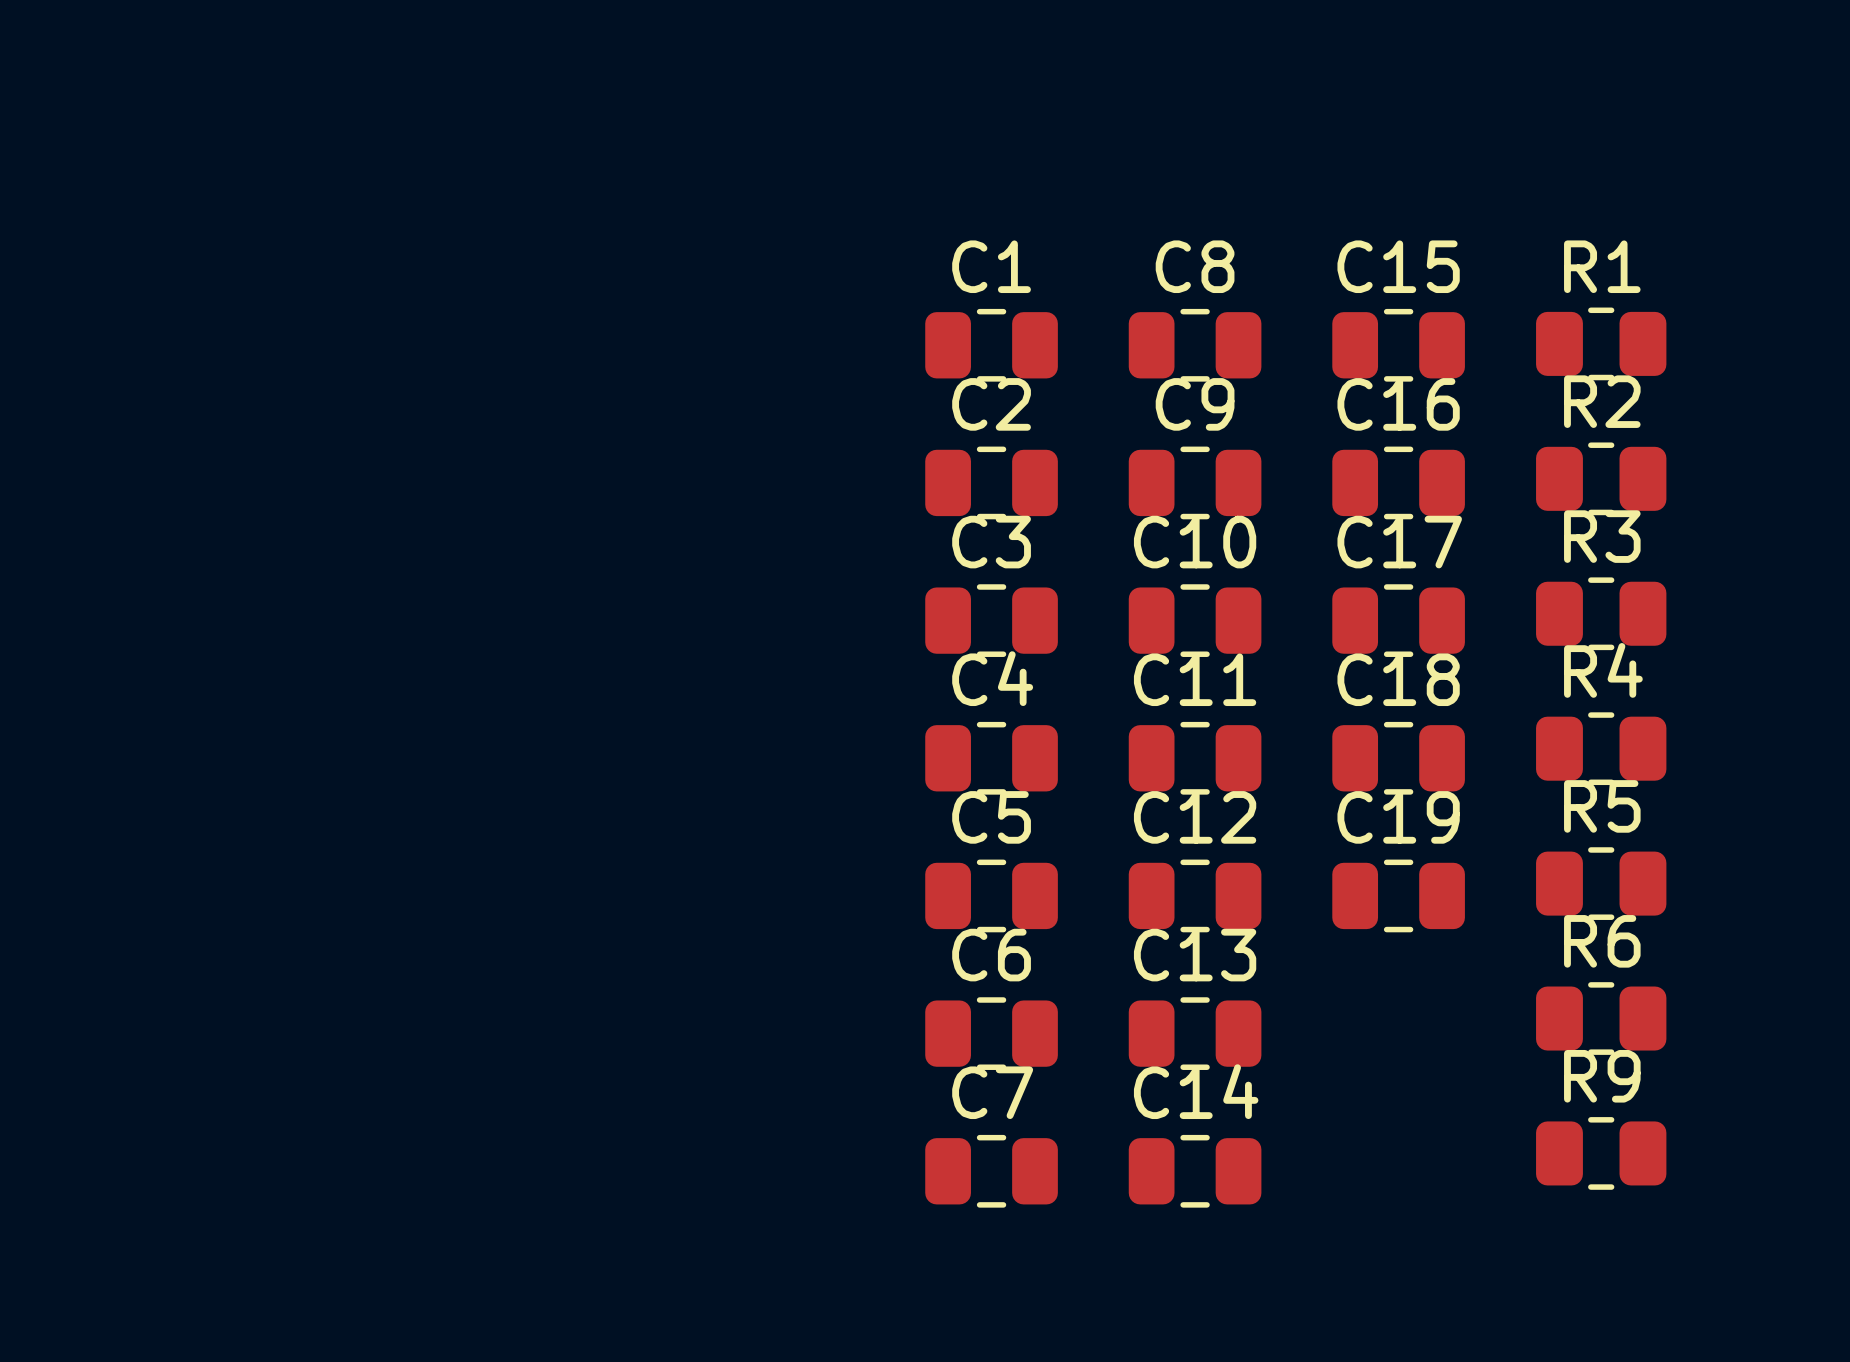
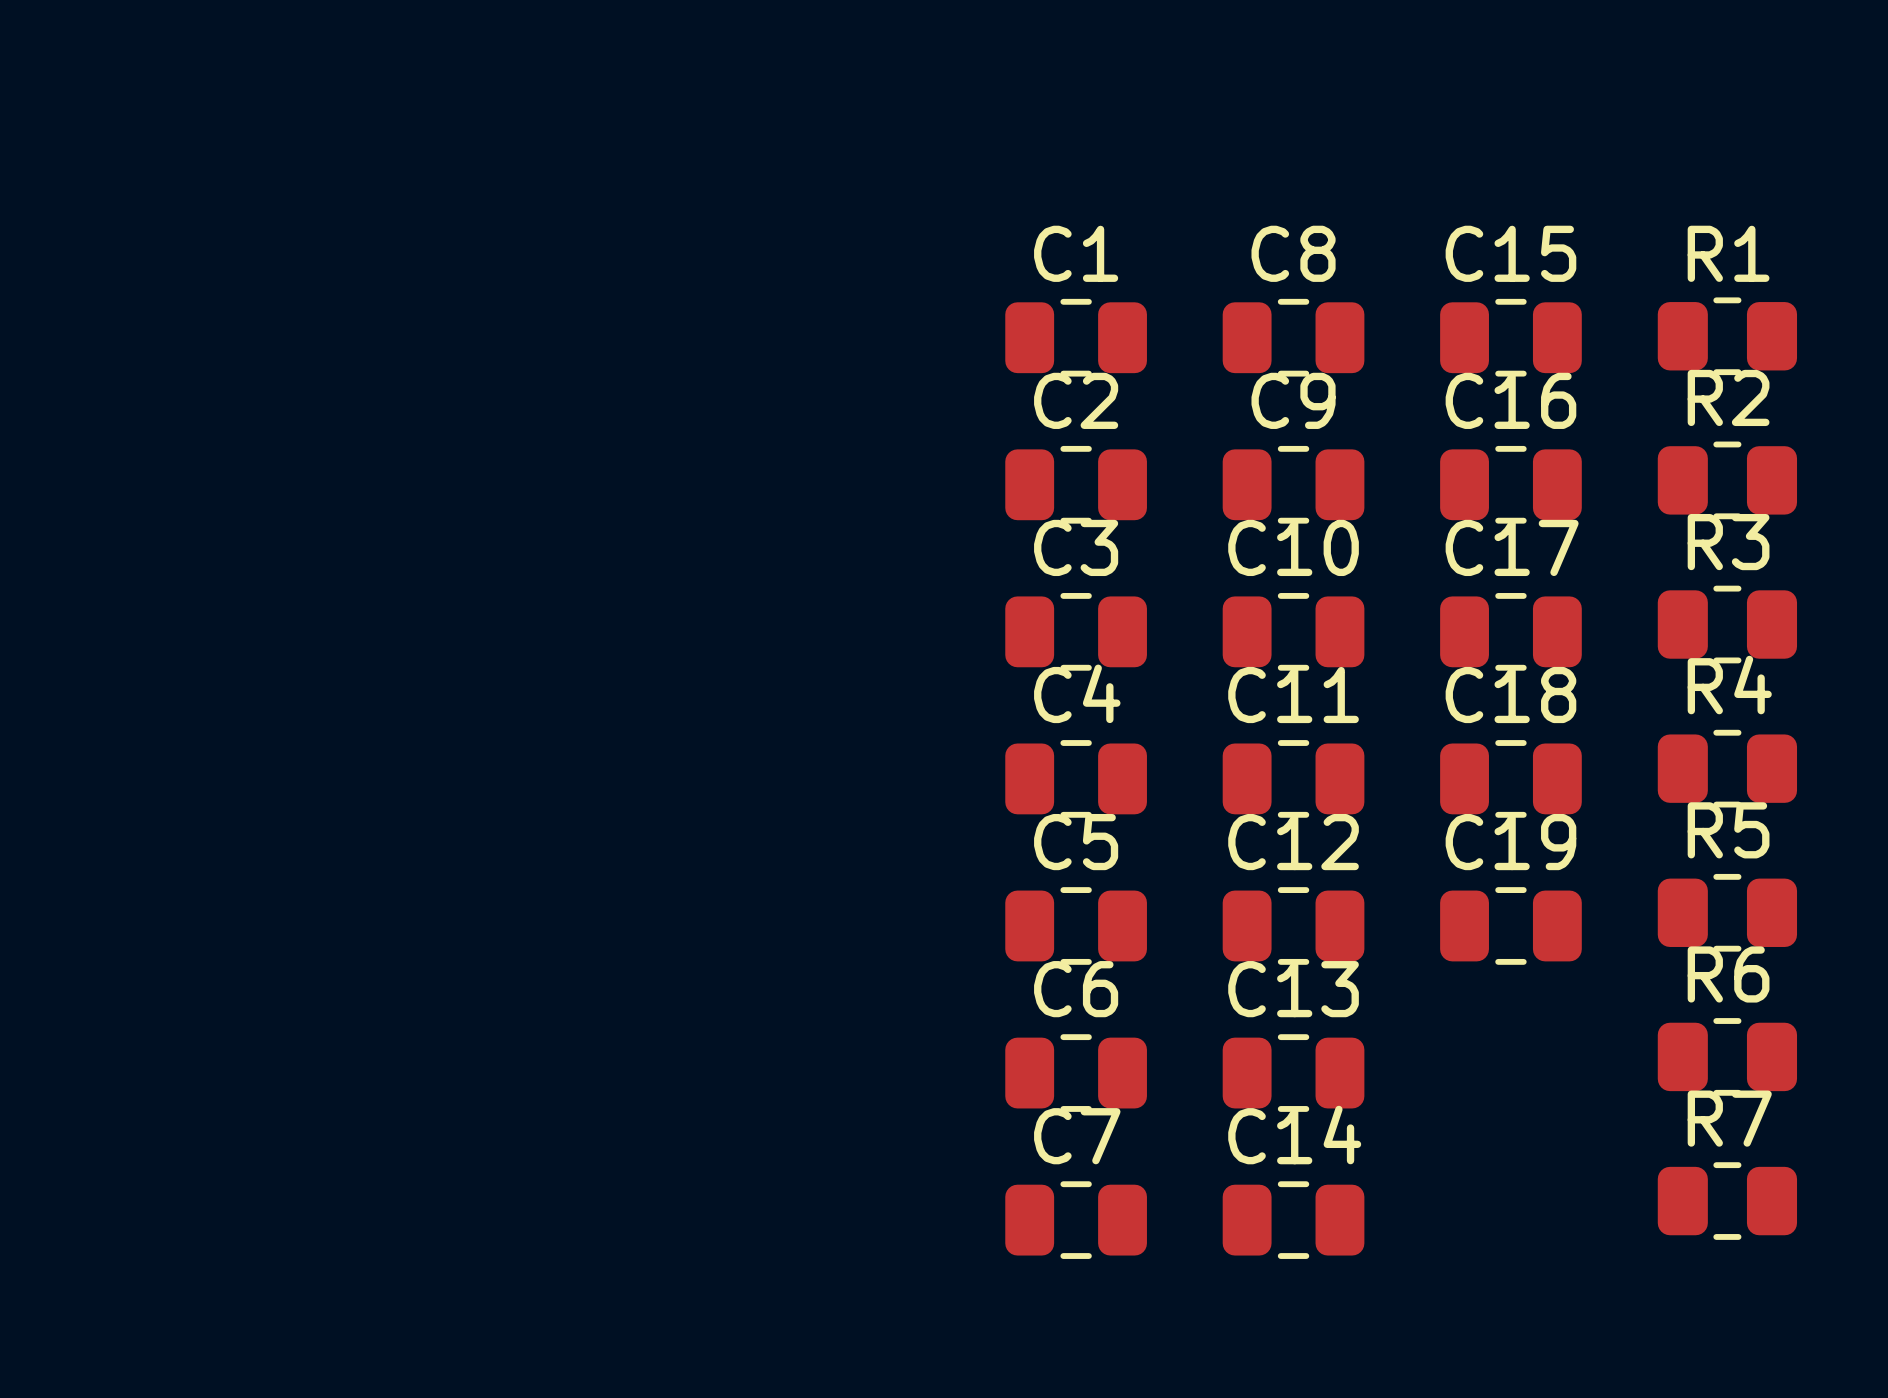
R9 name: R9 (1602, 1076) -> R7 (1729, 1118)

